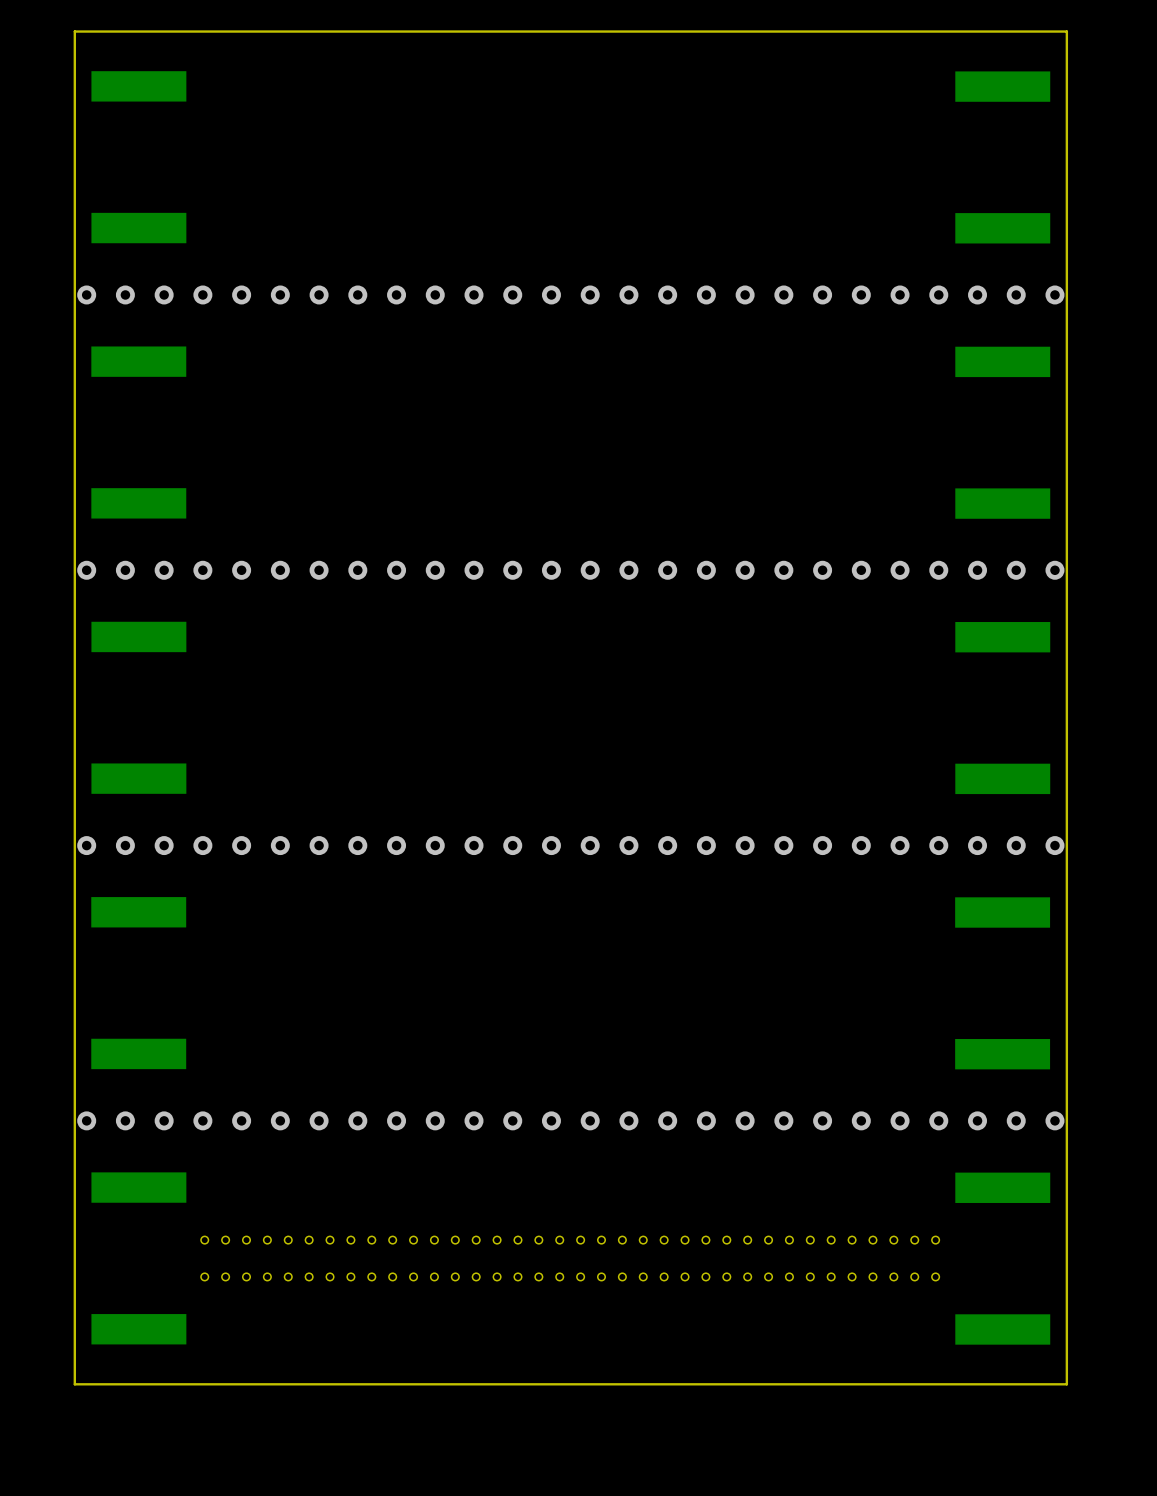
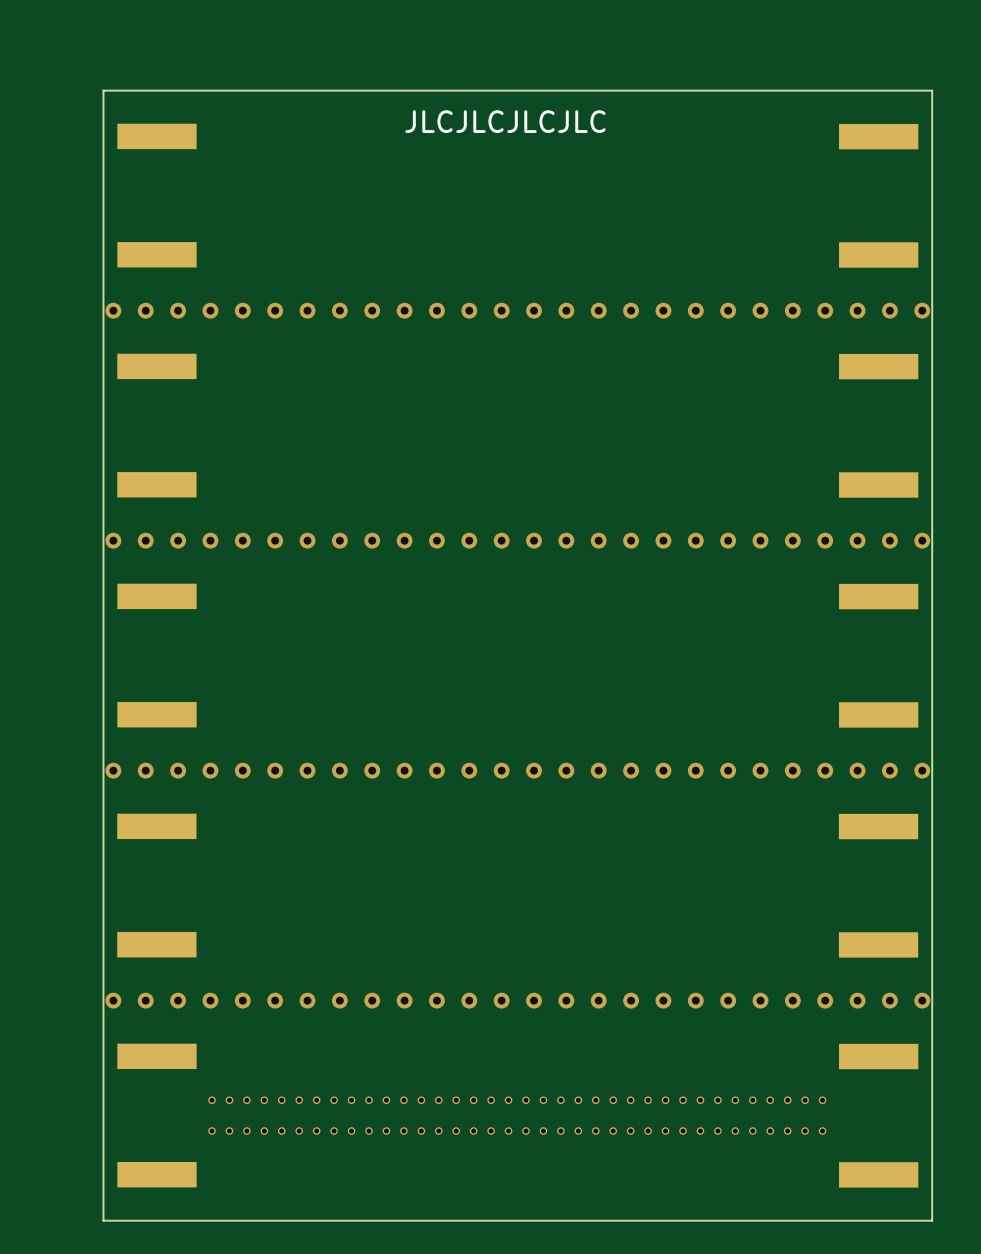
text: none -> JLCJLCJLCJLC (505, 121)

